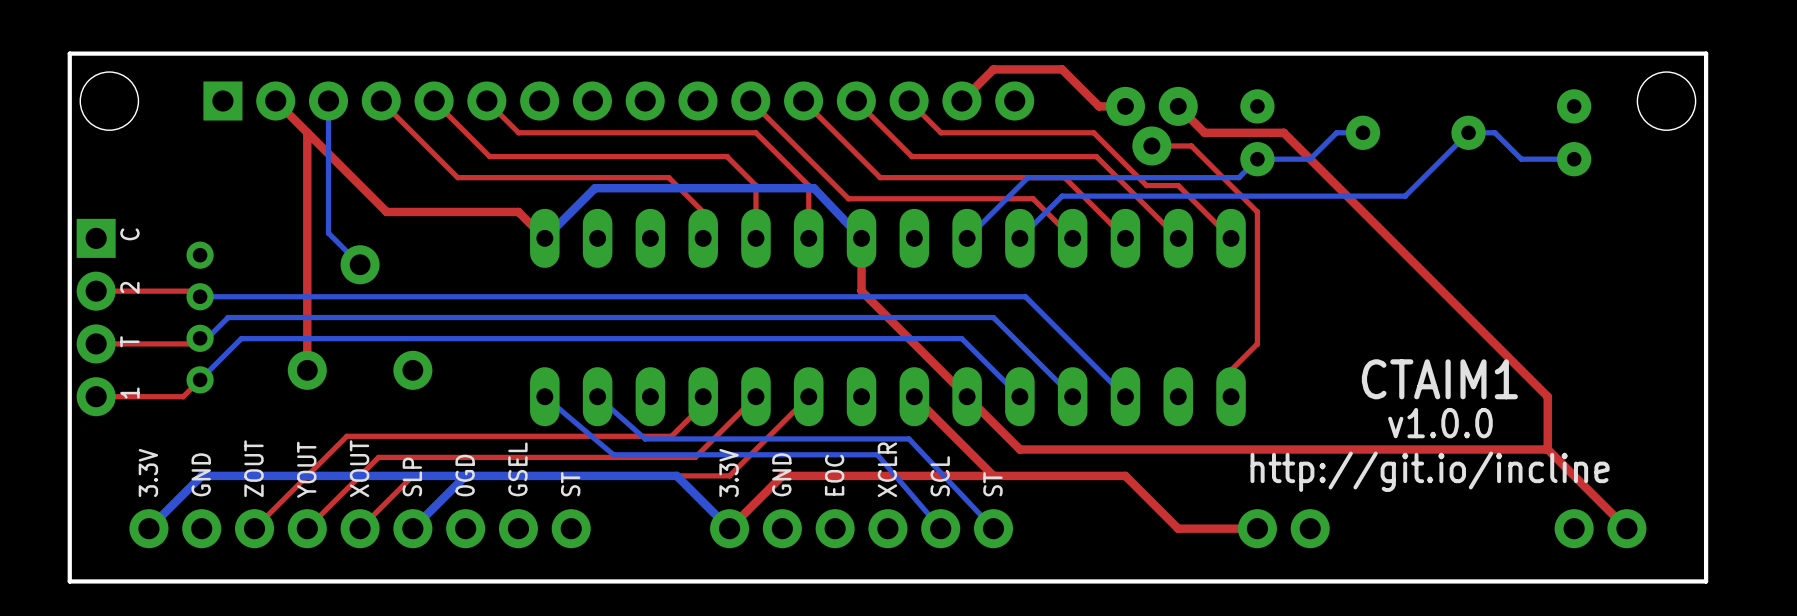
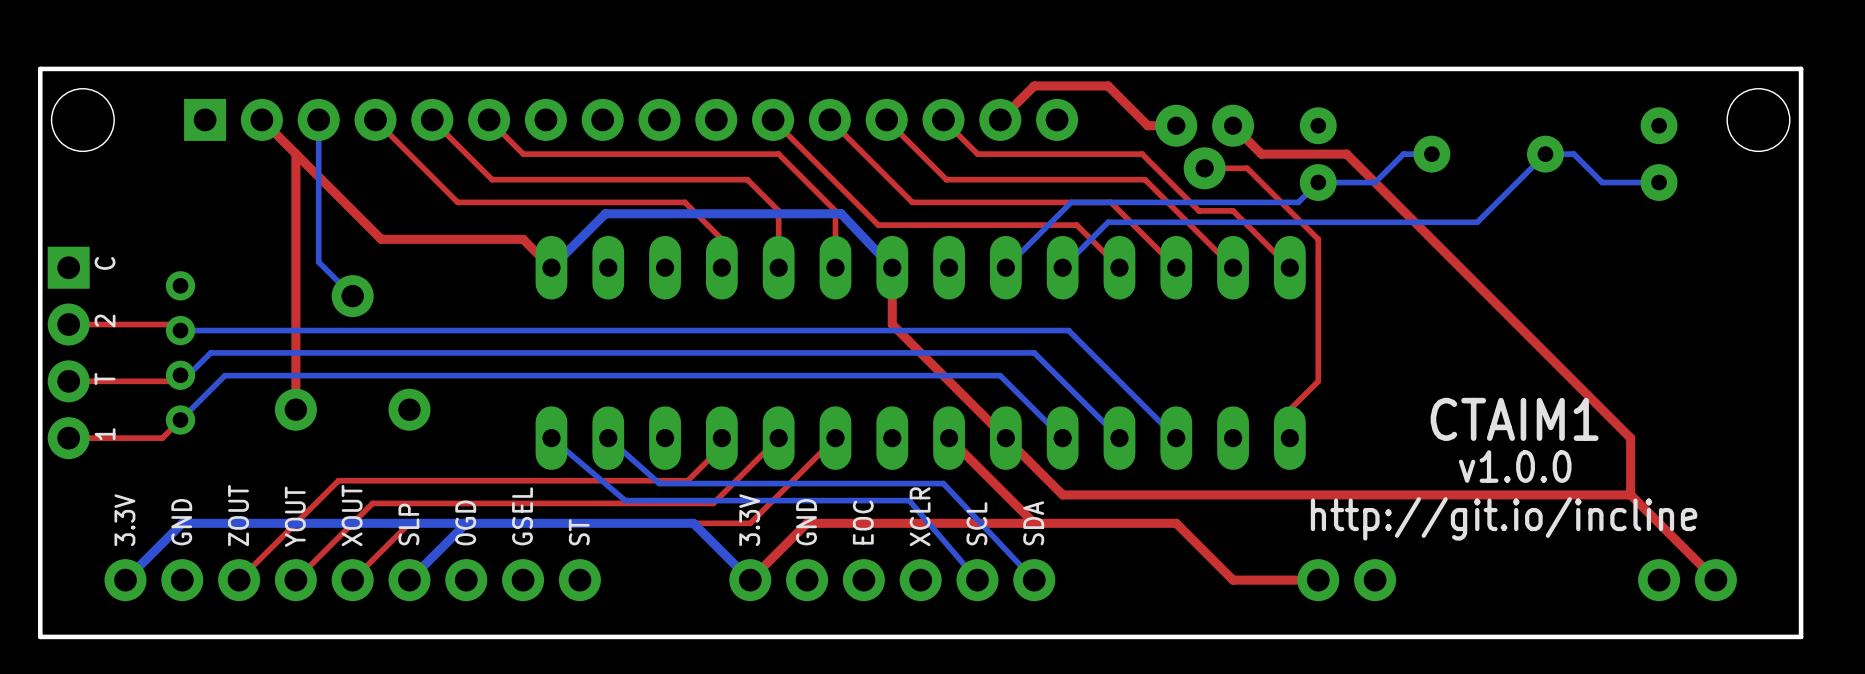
text: ST (992, 484) -> SDA (1033, 523)

